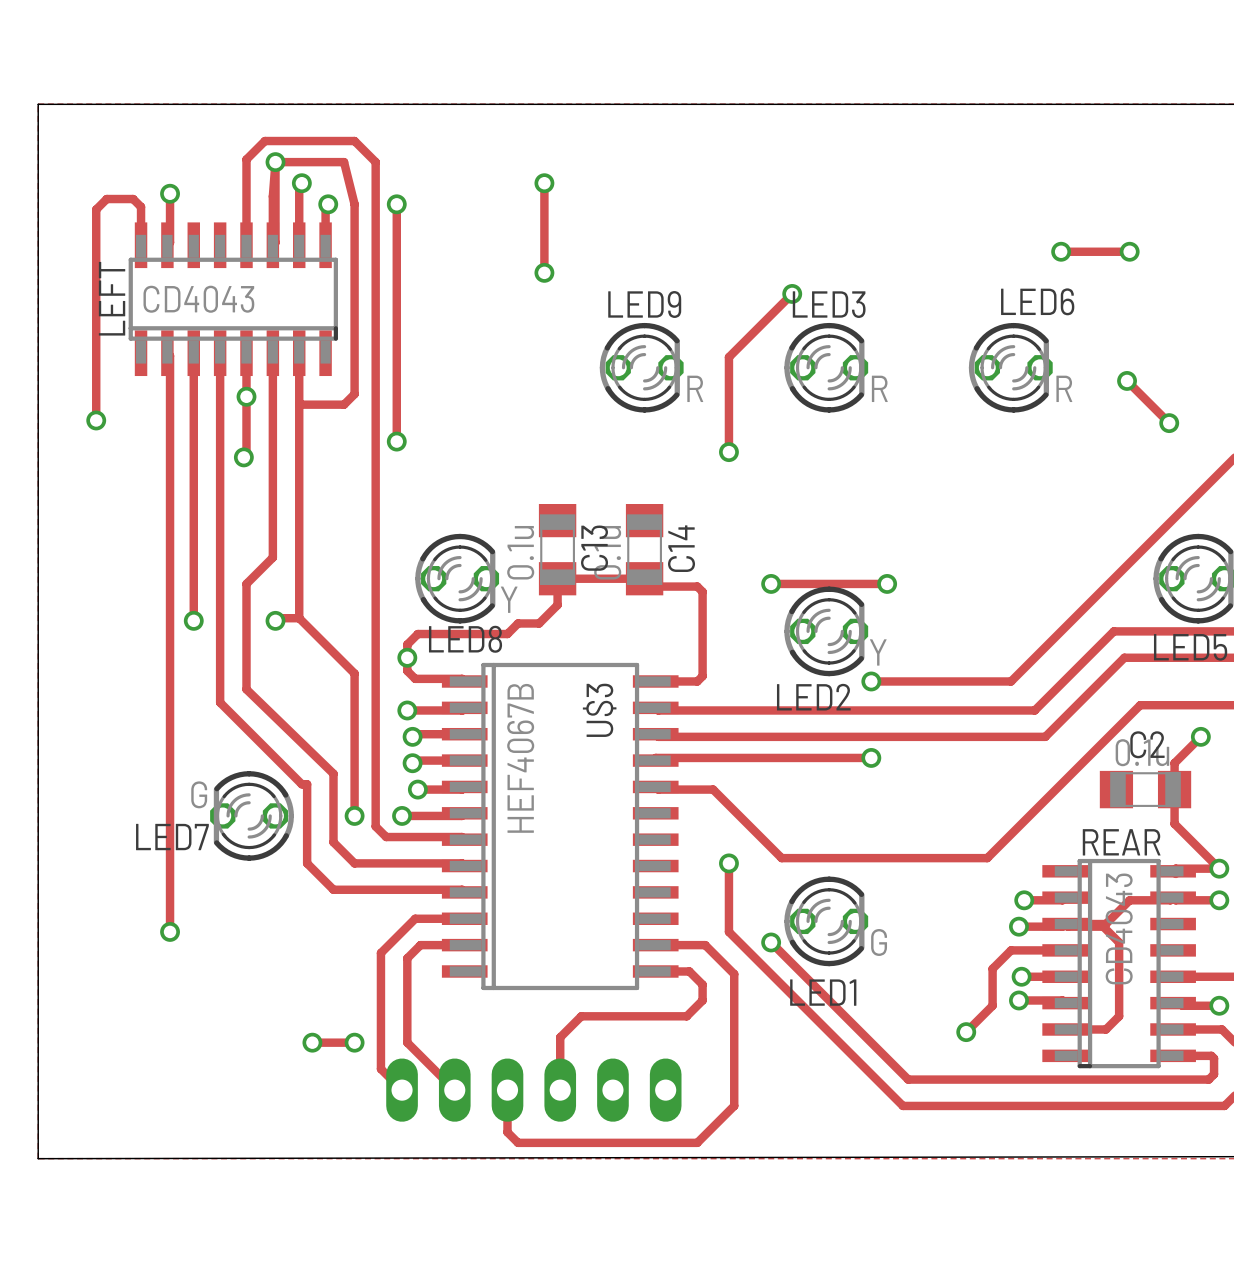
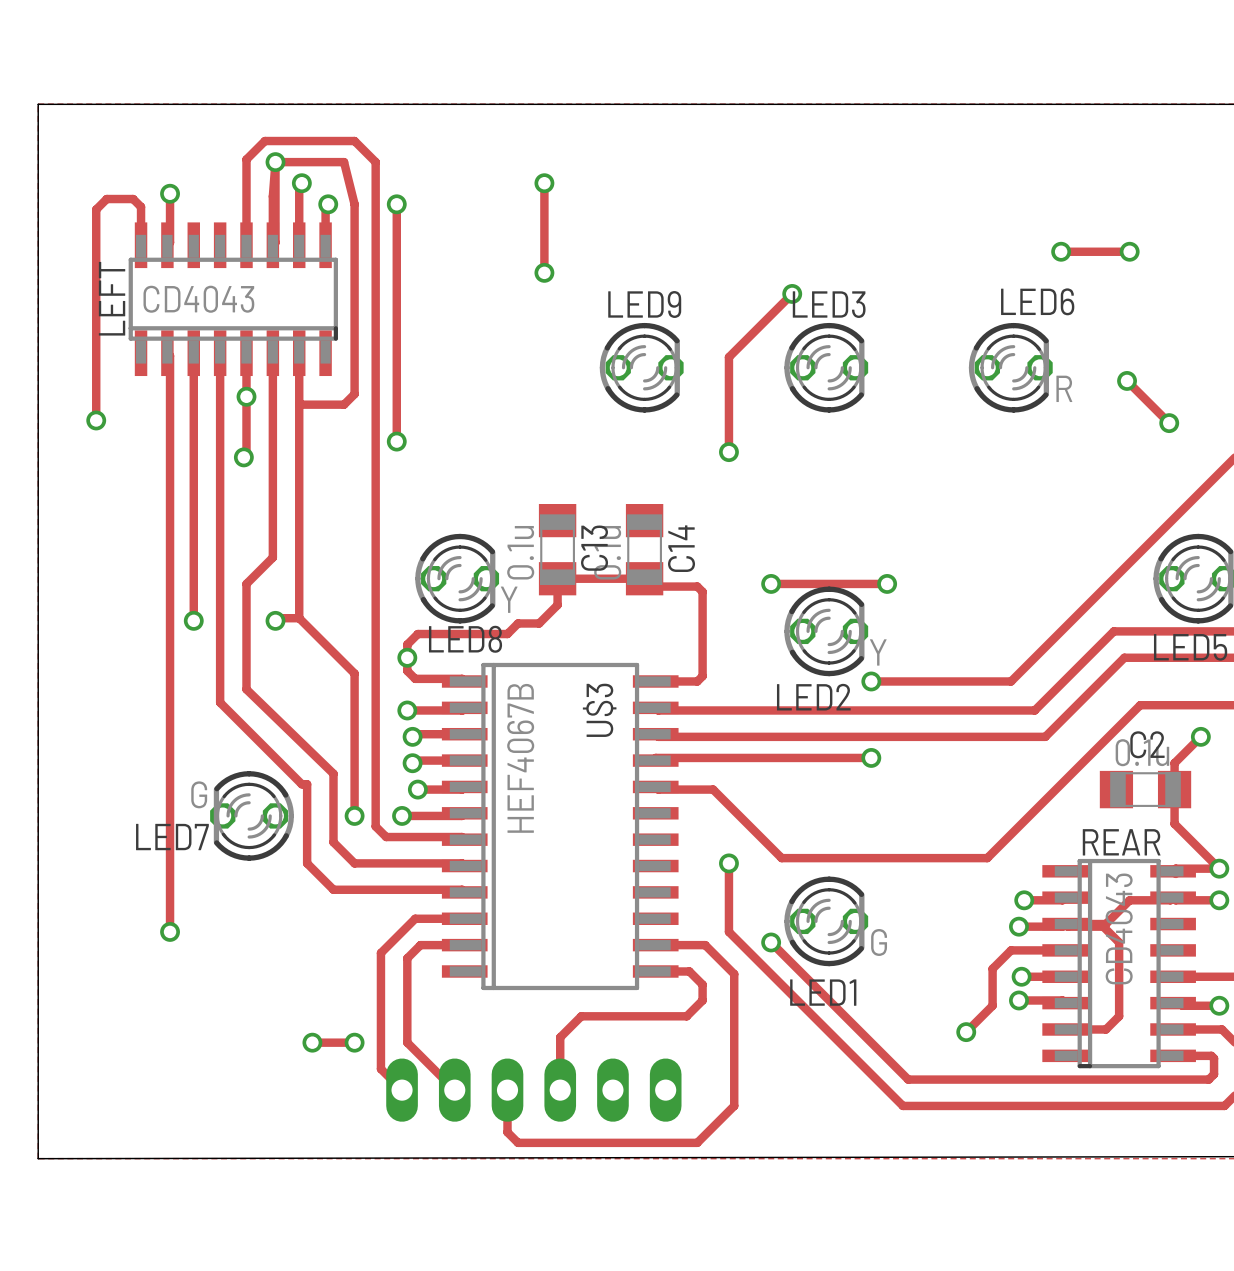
LED9 value: R (695, 388) -> none
LED3 value: R (879, 388) -> none

